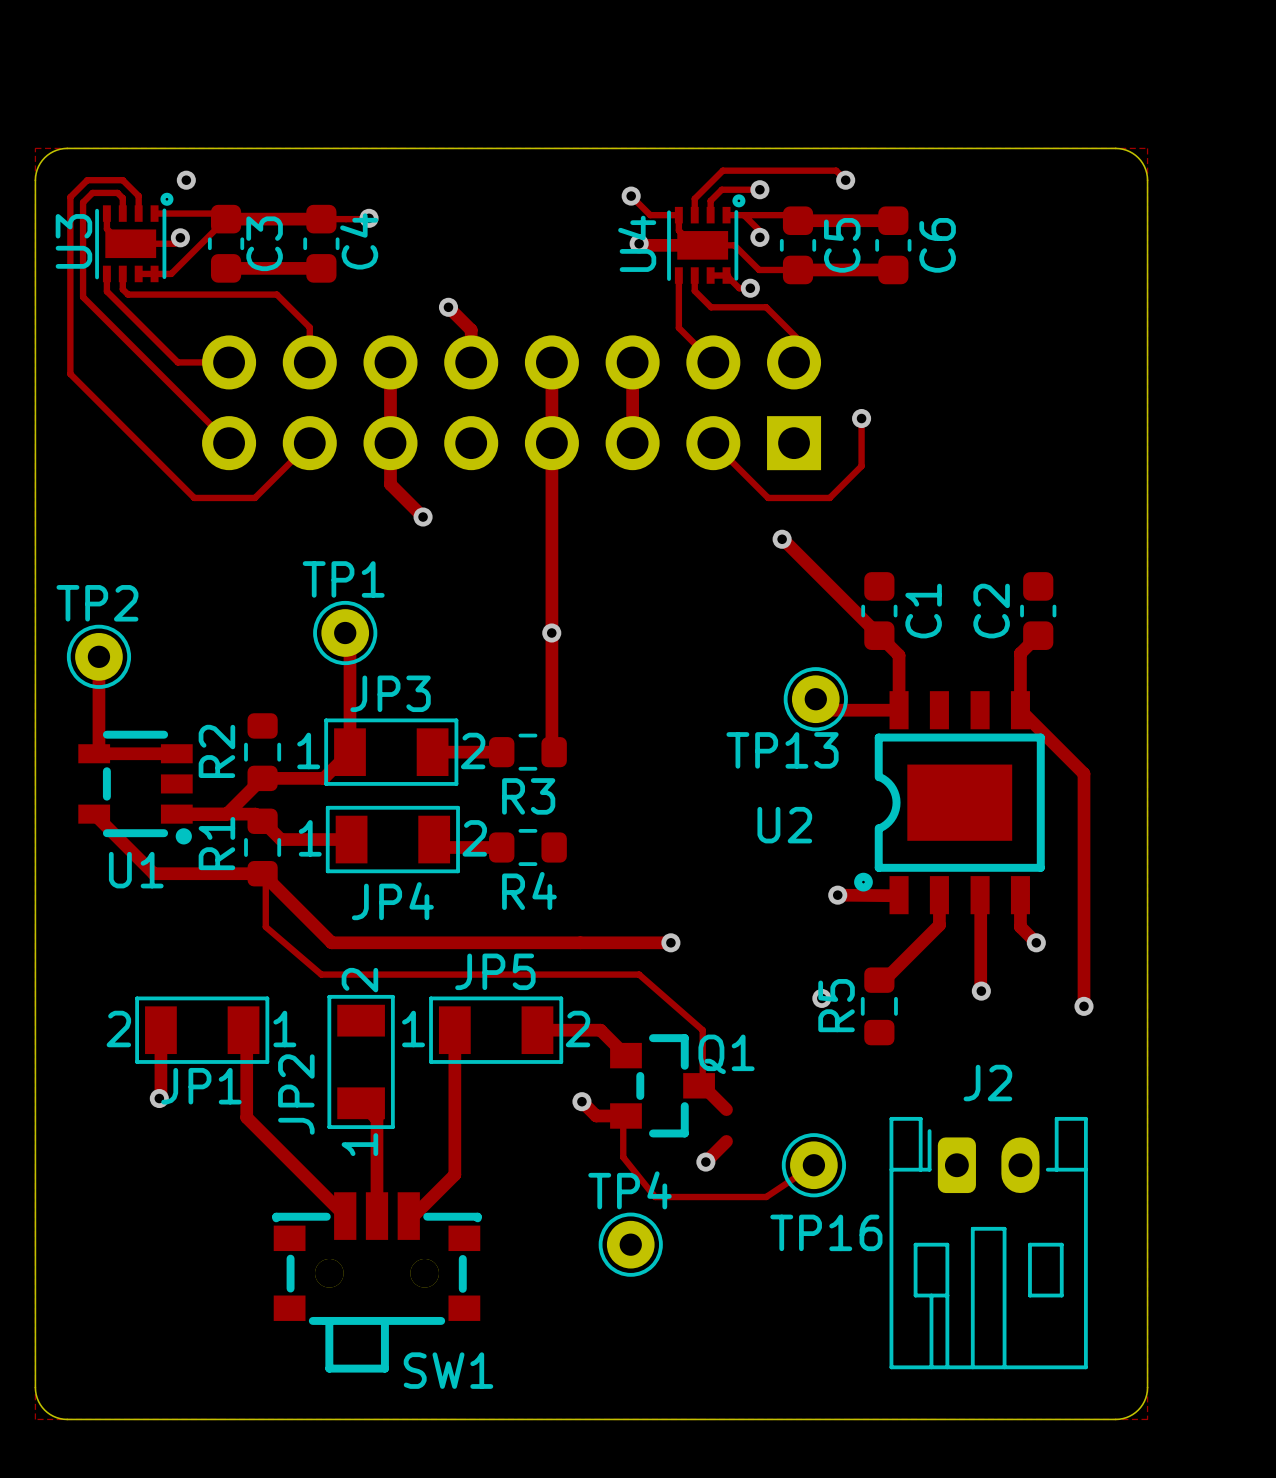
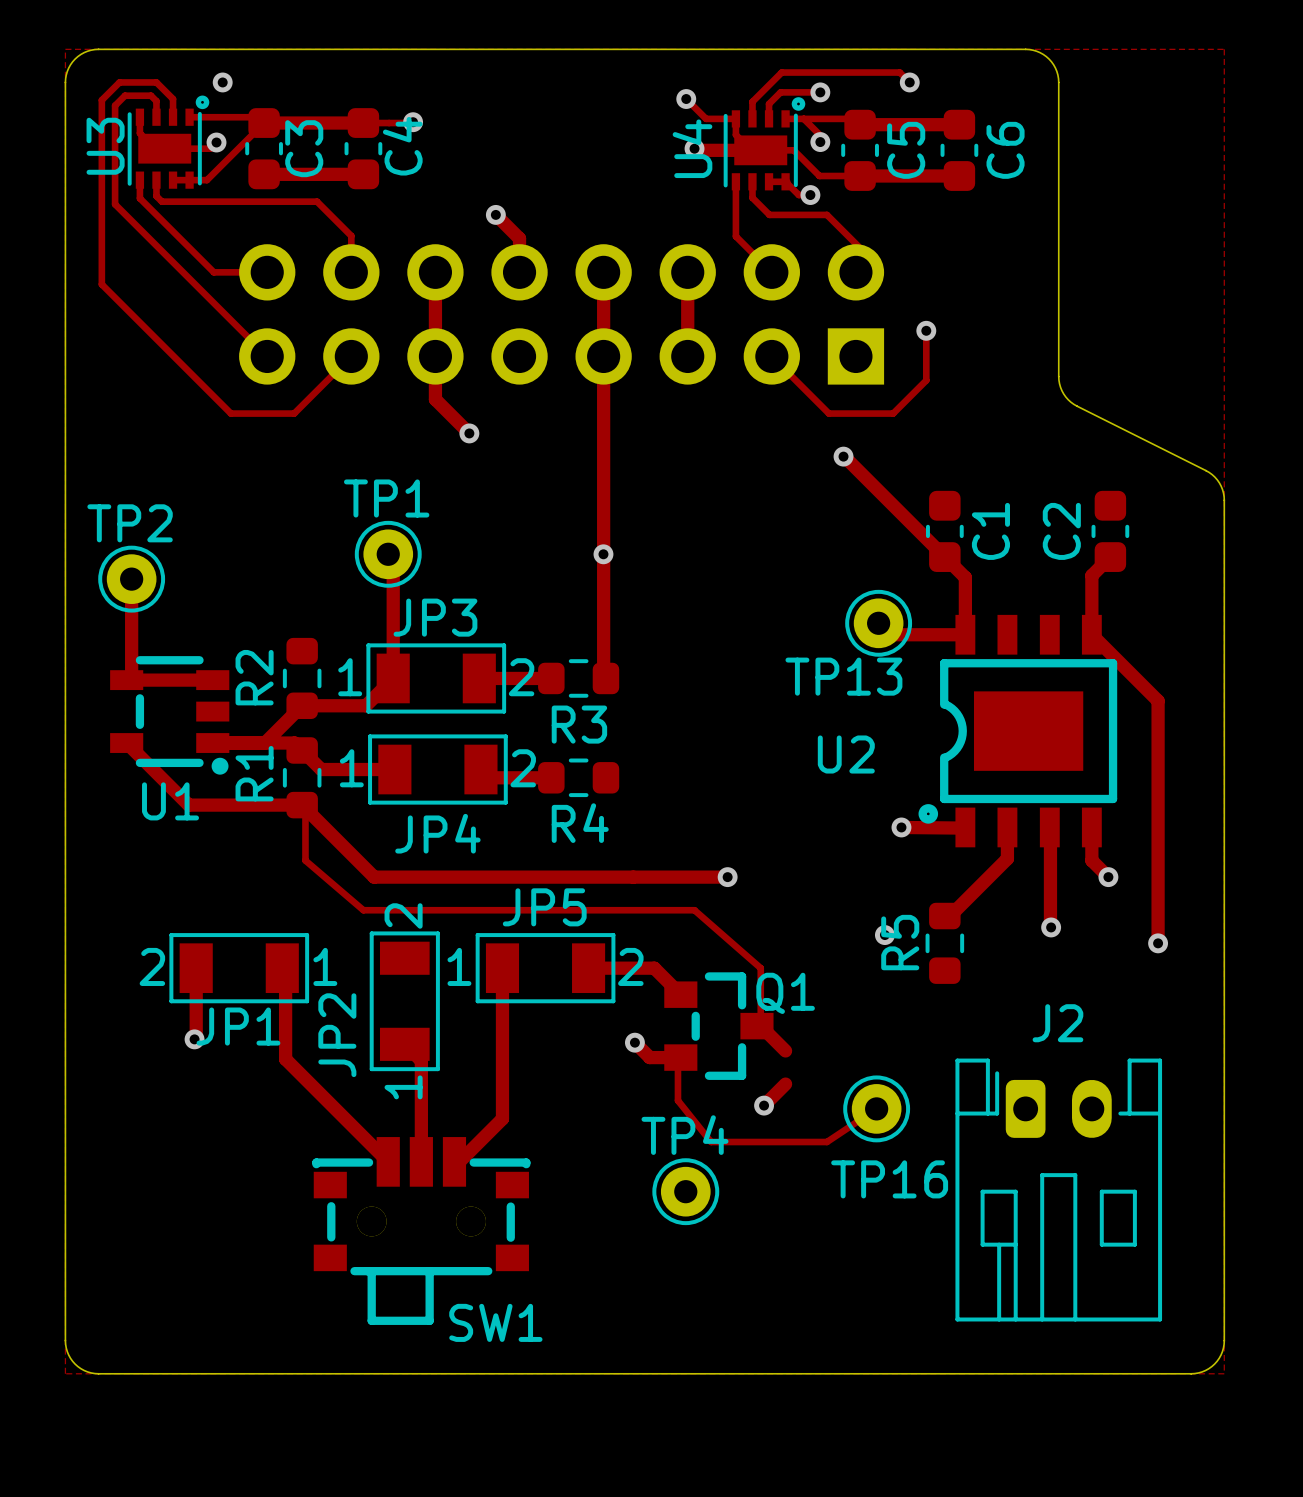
board edge: (956, 148) (1119, 148) (1132, 153) (1144, 166) (1147, 180) (1147, 581) -> (1025, 49) (1040, 52) (1049, 59) (1055, 68) (1058, 78) (1058, 376) (1061, 390) (1068, 399) (1077, 406) (1209, 472) (1219, 482) (1224, 500)

